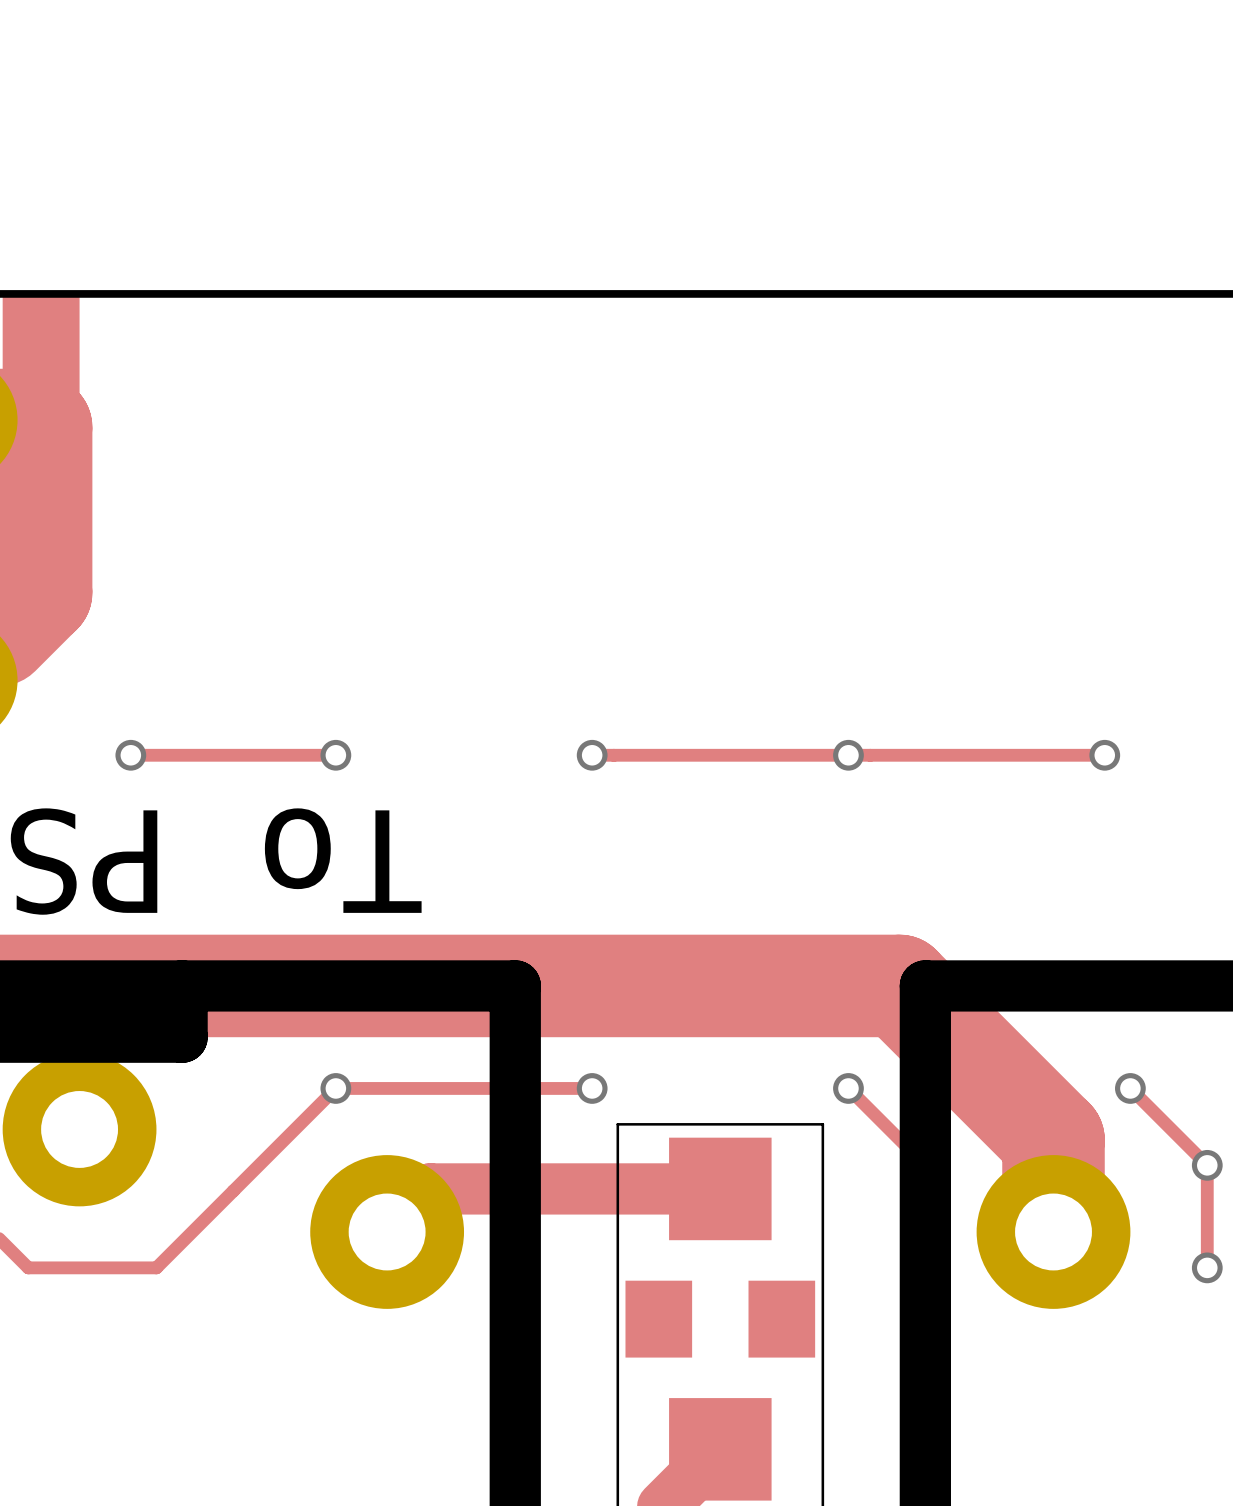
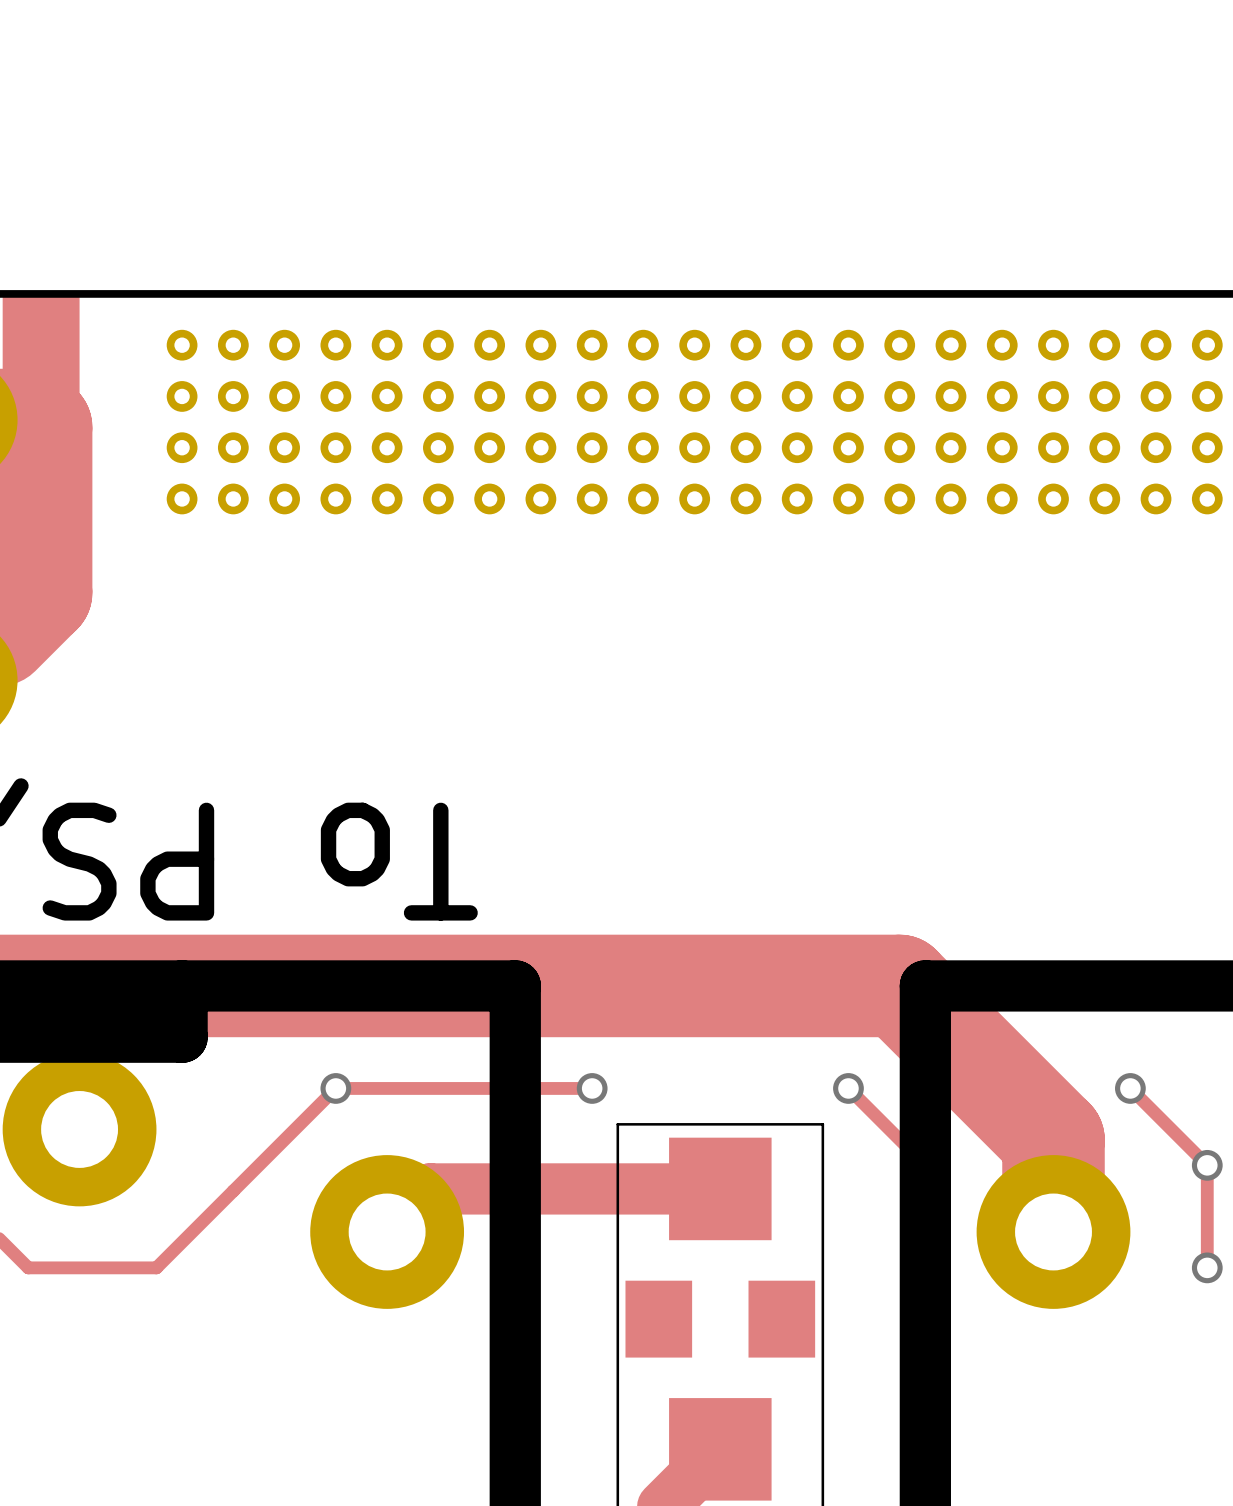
part: none -> (182, 345)
part: none -> (233, 345)
part: none -> (284, 345)
part: none -> (335, 345)
part: none -> (387, 345)
part: none -> (438, 345)
part: none -> (489, 345)
part: none -> (540, 345)
part: none -> (592, 345)
part: none -> (643, 345)
part: none -> (694, 345)
part: none -> (745, 345)
part: none -> (797, 345)
part: none -> (848, 345)
part: none -> (899, 345)
part: none -> (950, 345)
part: none -> (1002, 345)
part: none -> (1053, 345)
part: none -> (1104, 345)
part: none -> (1156, 345)
part: none -> (1207, 345)
part: none -> (182, 396)
part: none -> (233, 396)
part: none -> (284, 396)
part: none -> (335, 396)
part: none -> (387, 396)
part: none -> (438, 396)
part: none -> (489, 396)
part: none -> (540, 396)
part: none -> (592, 396)
part: none -> (643, 396)
part: none -> (694, 396)
part: none -> (745, 396)
part: none -> (797, 396)
part: none -> (848, 396)
part: none -> (899, 396)
part: none -> (950, 396)
part: none -> (1002, 396)
part: none -> (1053, 396)
part: none -> (1104, 396)
part: none -> (1156, 396)
part: none -> (1207, 396)
part: none -> (182, 447)
part: none -> (233, 447)
part: none -> (284, 447)
part: none -> (335, 447)
part: none -> (387, 447)
part: none -> (438, 447)
part: none -> (489, 447)
part: none -> (540, 447)
part: none -> (592, 447)
part: none -> (643, 447)
part: none -> (694, 447)
part: none -> (745, 447)
part: none -> (797, 447)
part: none -> (848, 447)
part: none -> (899, 447)
part: none -> (950, 447)
part: none -> (1002, 447)
part: none -> (1053, 447)
part: none -> (1104, 447)
part: none -> (1156, 447)
part: none -> (1207, 447)
part: none -> (182, 498)
part: none -> (233, 498)
part: none -> (284, 498)
part: none -> (335, 498)
part: none -> (387, 498)
part: none -> (438, 498)
part: none -> (489, 498)
part: none -> (540, 498)
part: none -> (592, 498)
part: none -> (643, 498)
part: none -> (694, 498)
part: none -> (745, 498)
part: none -> (797, 498)
part: none -> (848, 498)
part: none -> (899, 498)
part: none -> (950, 498)
part: none -> (1002, 498)
part: none -> (1053, 498)
part: none -> (1104, 498)
part: none -> (1156, 498)
part: none -> (1207, 498)
track: (130, 755) (335, 755) -> none
via: (130, 755) -> none
via: (335, 755) -> none
track: (592, 755) (1104, 755) -> none
via: (592, 755) -> none
via: (848, 755) -> none
via: (1104, 755) -> none

